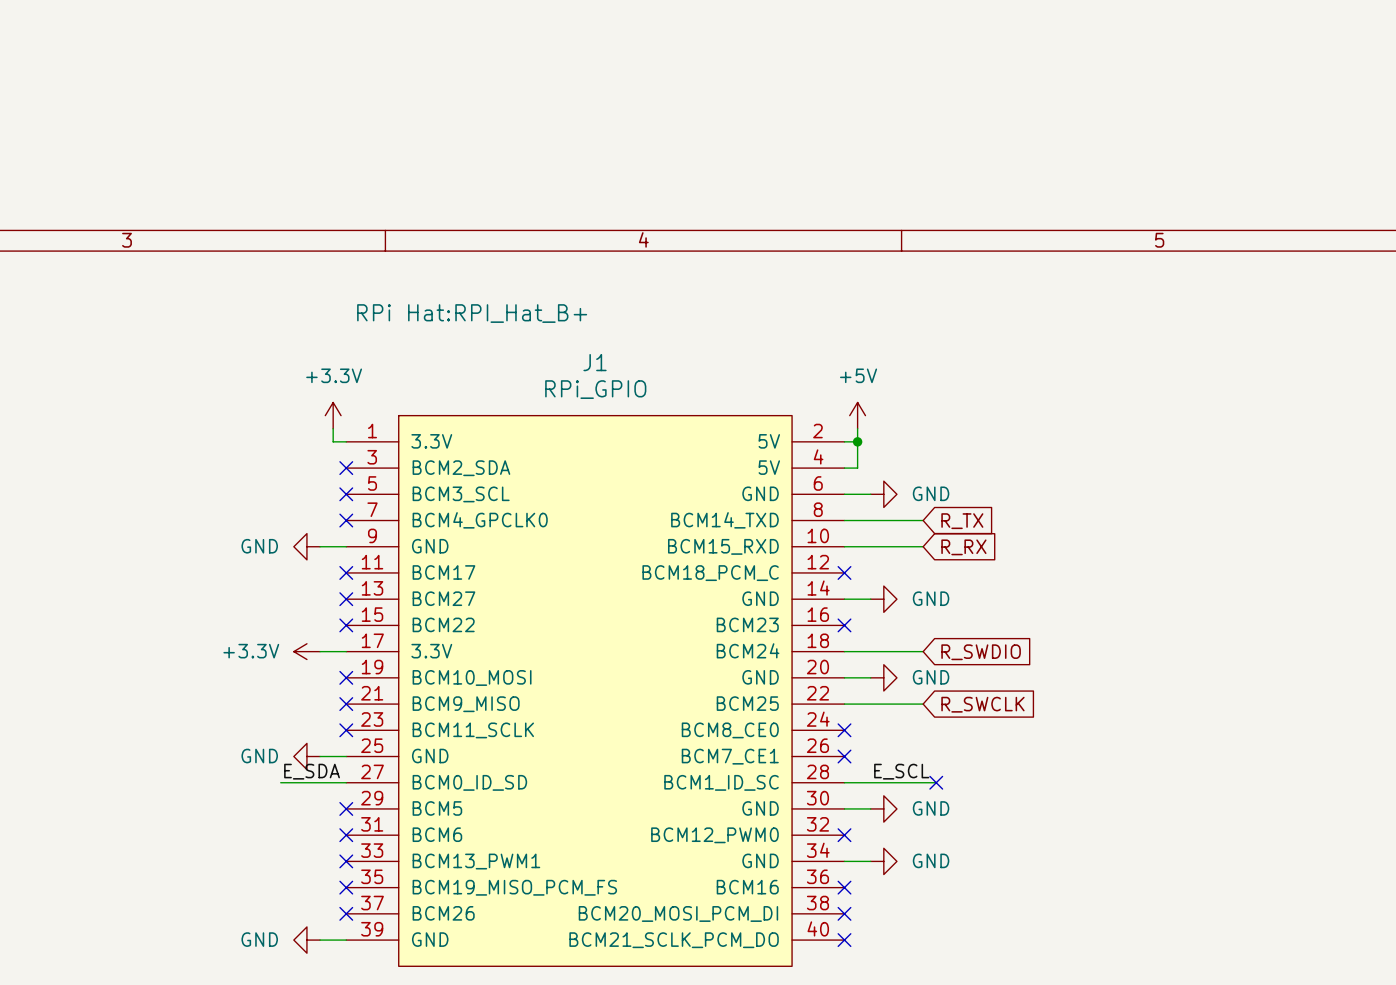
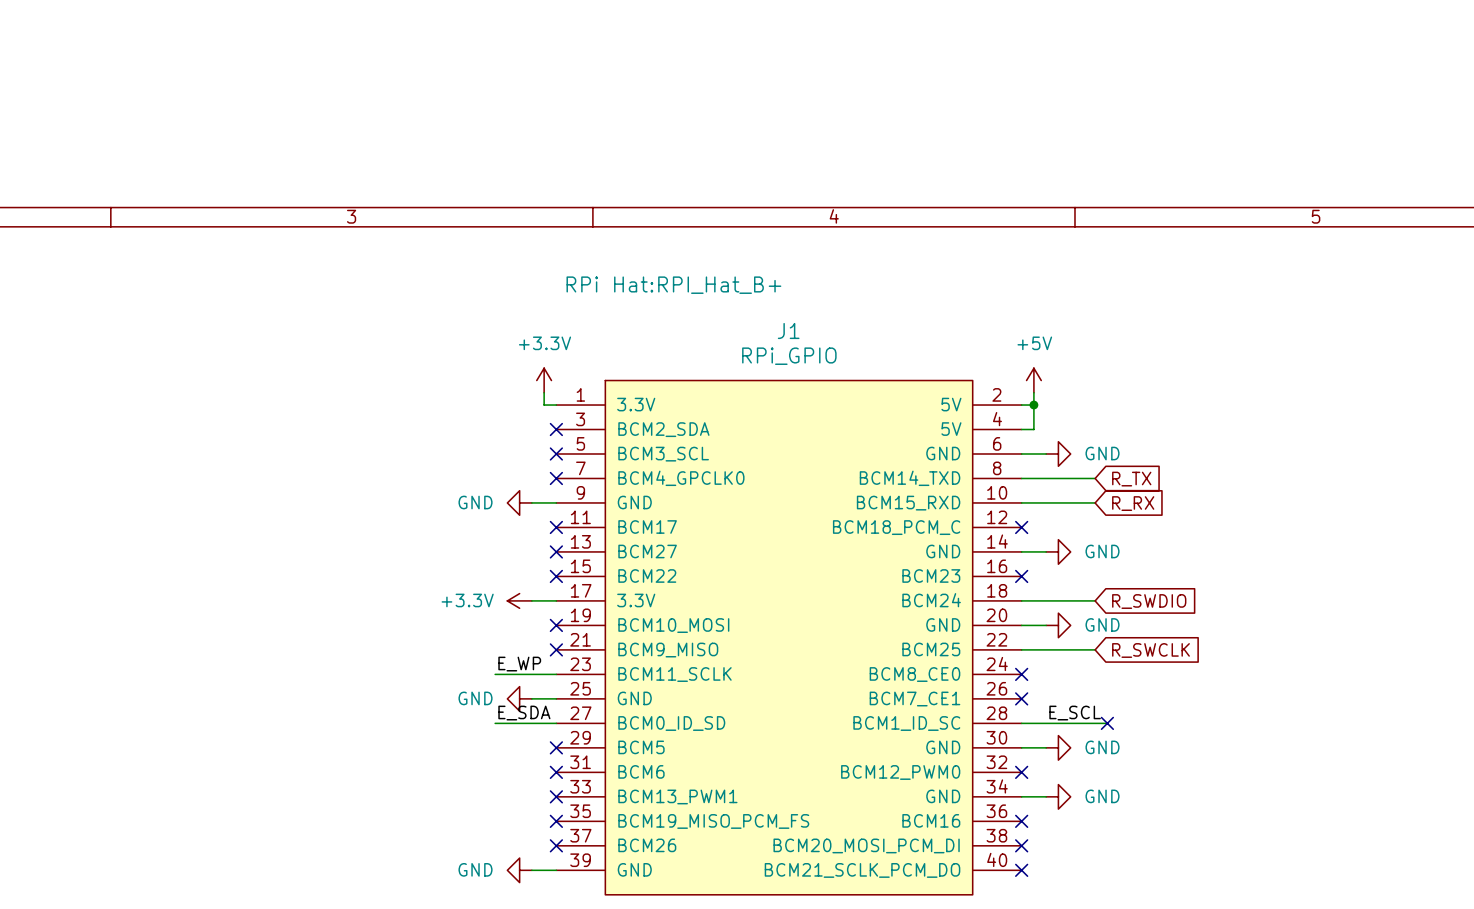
label: none -> E_WP (519, 664)
wire: none -> (495, 674) (556, 674)
no-connect mark: (346, 730) -> none

